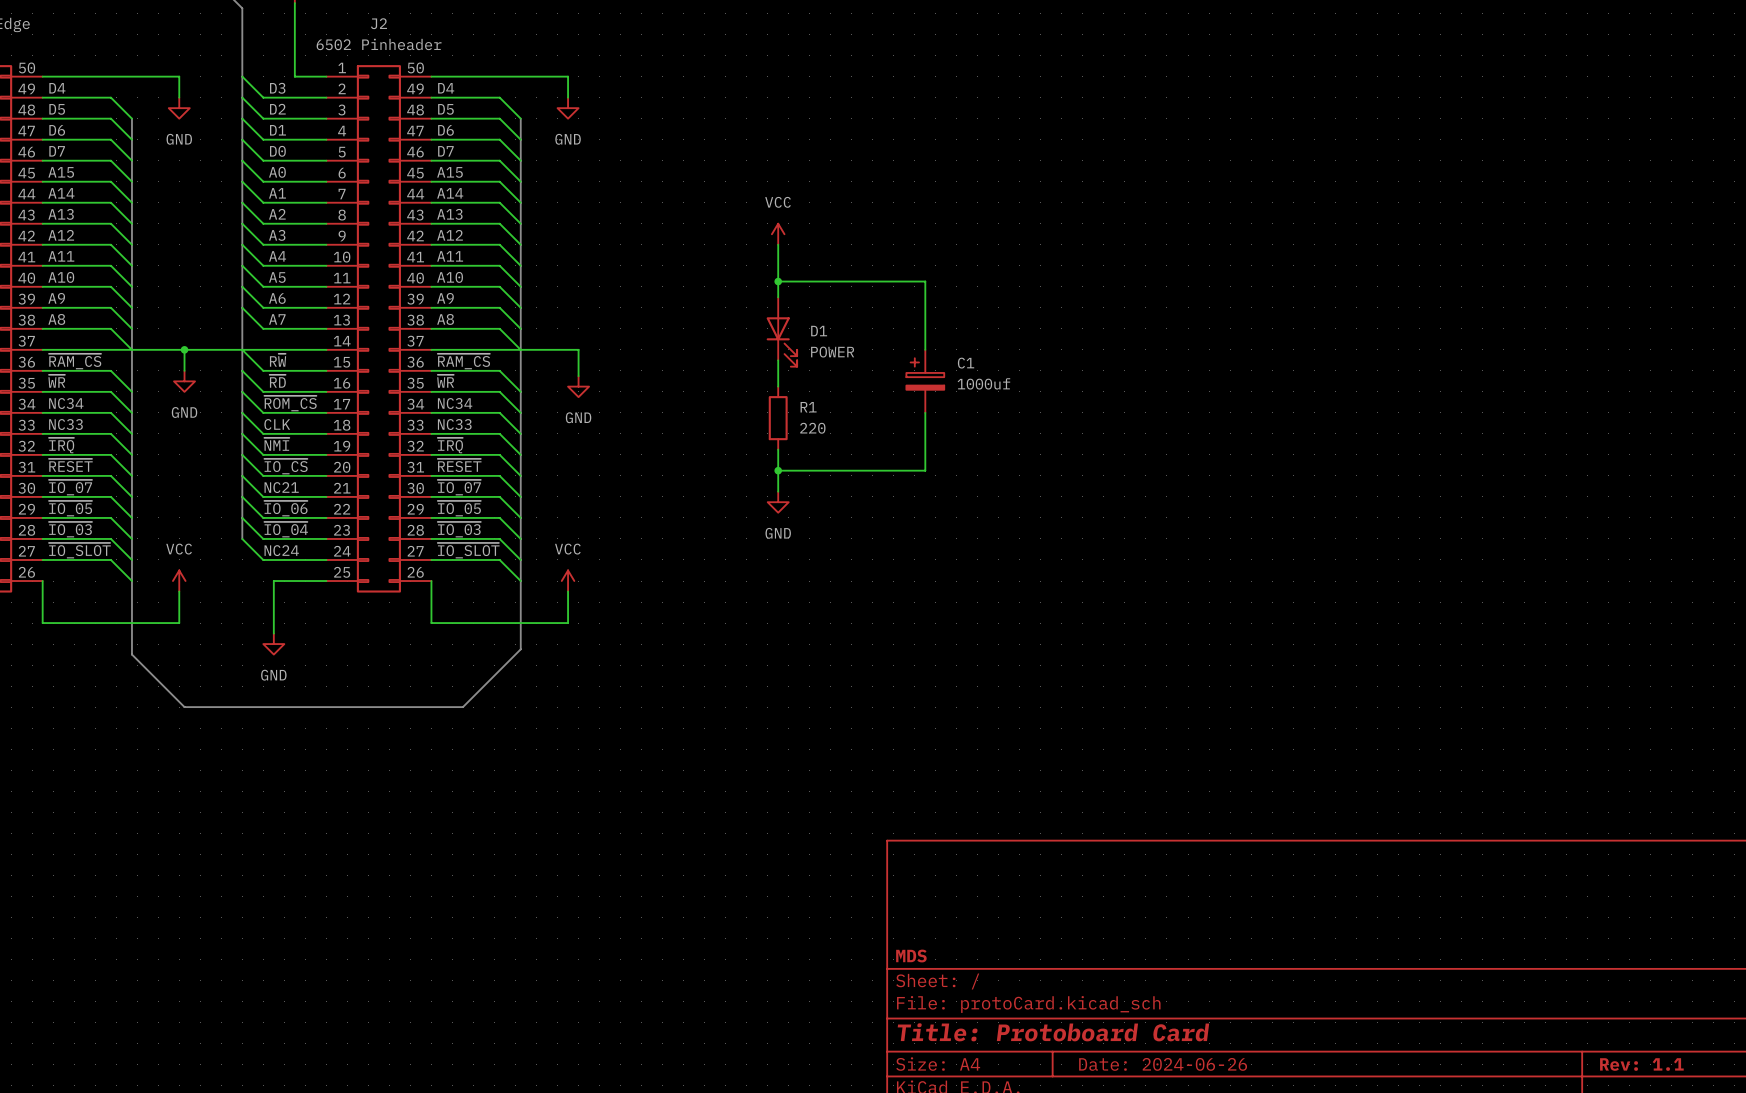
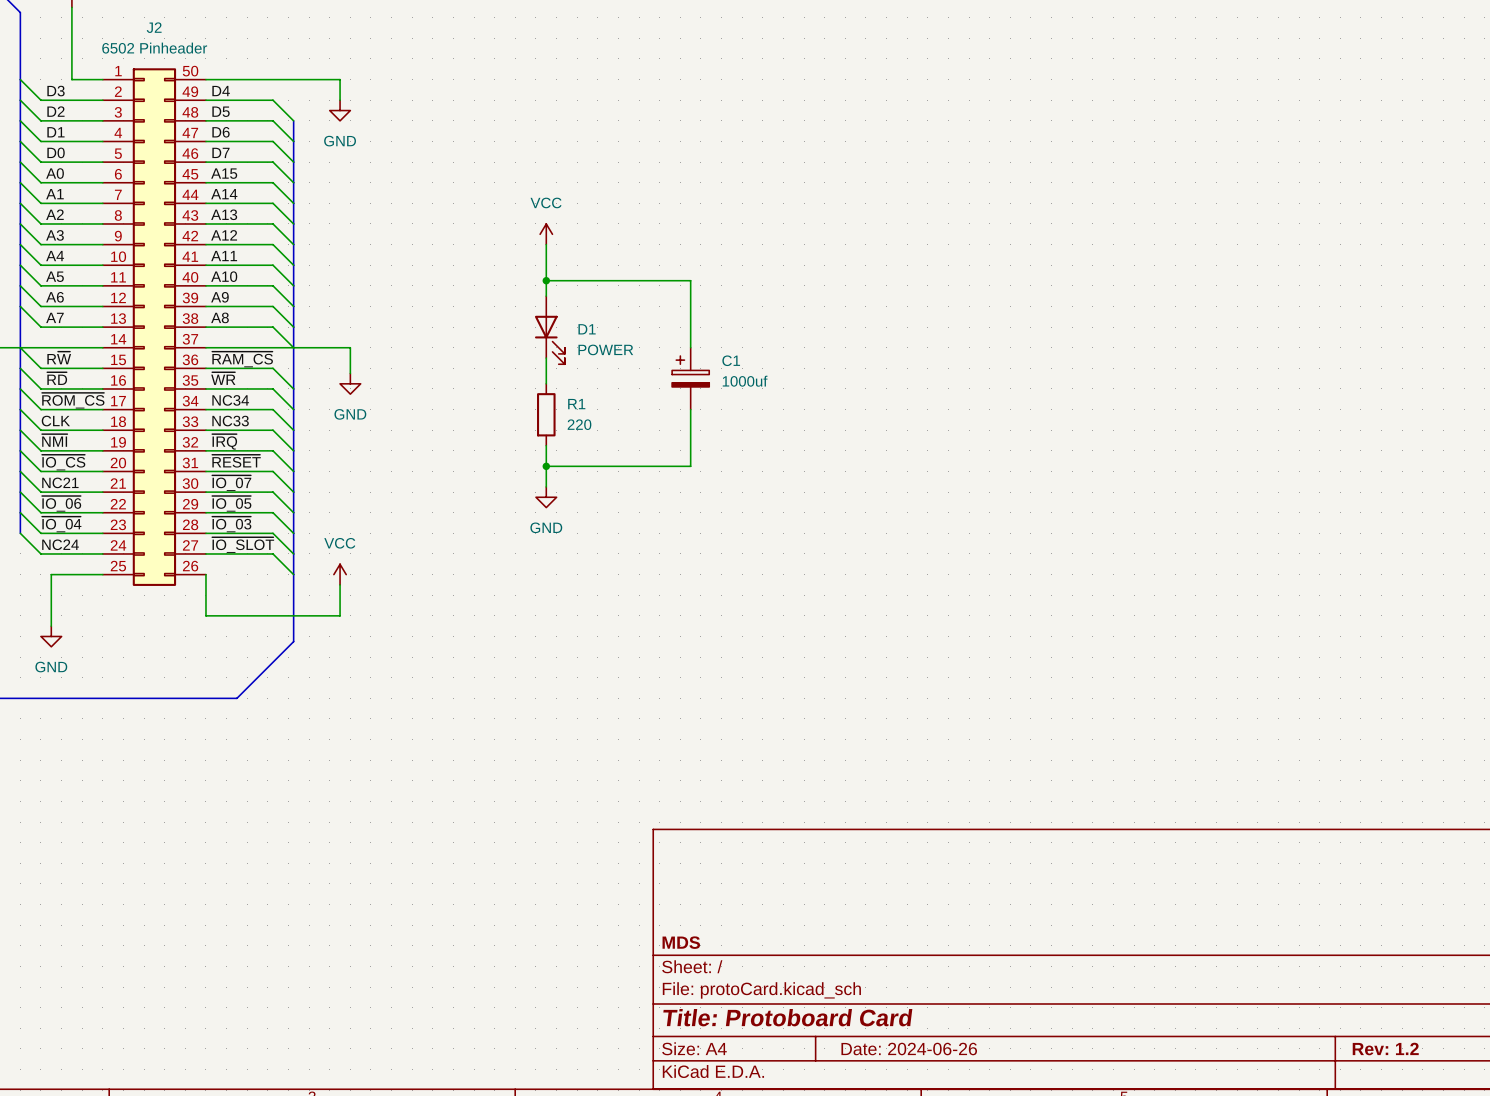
title block: Rev: 1.1 (1641, 1064) -> Rev: 1.2 (1385, 1049)

